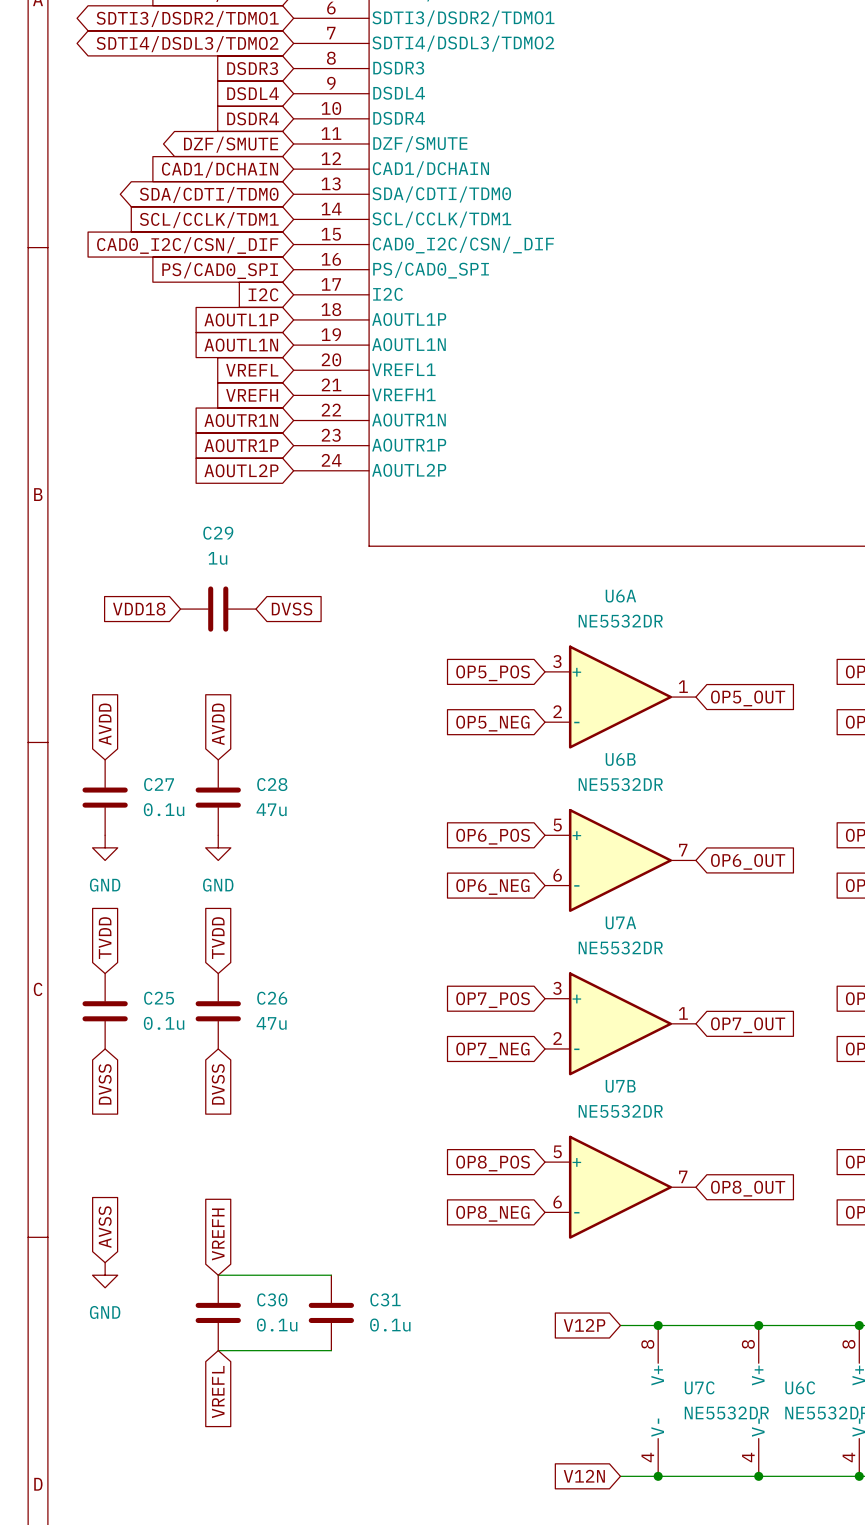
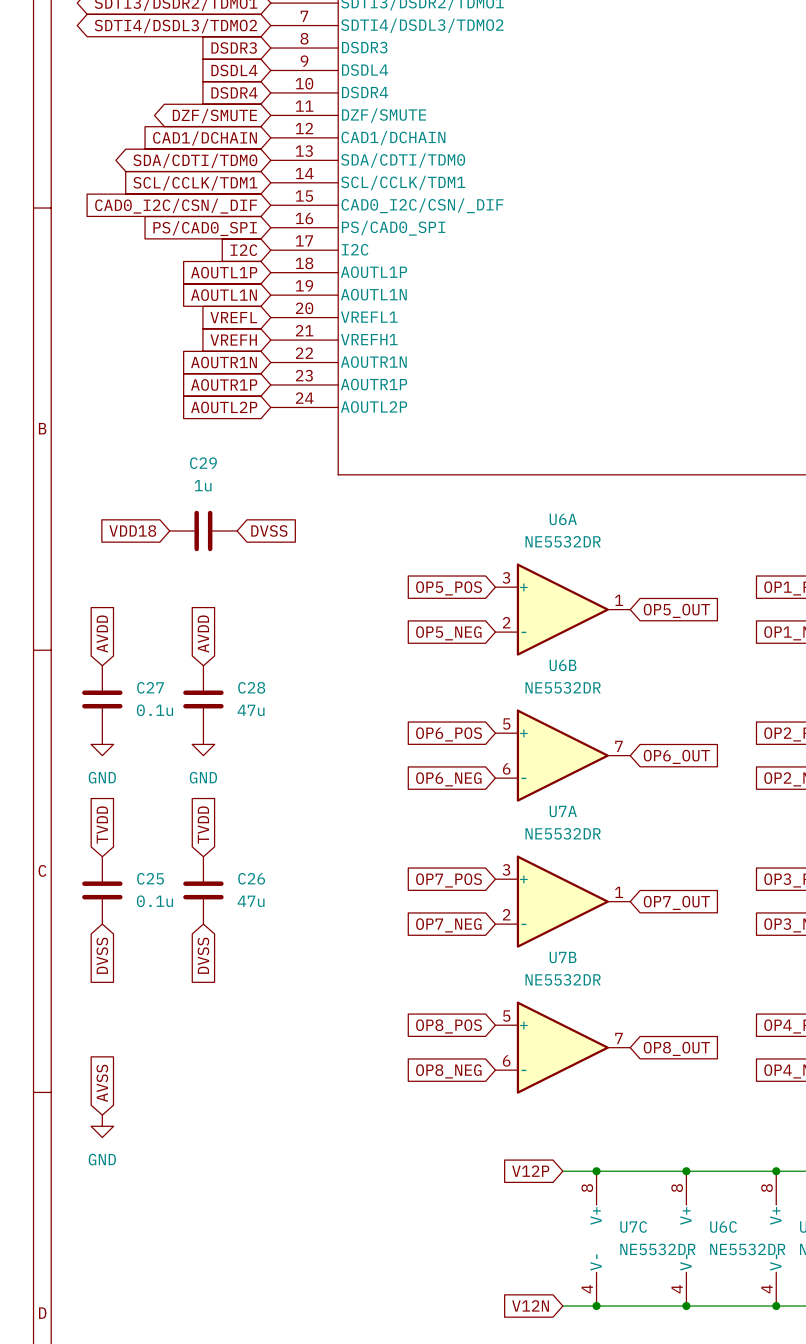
global label: VREFH (218, 1234) -> none
wire: (218, 1275) (331, 1275) -> none
C30: 0.1u (218, 1312) -> none
C31: 0.1u (331, 1312) -> none
wire: (218, 1350) (331, 1350) -> none
global label: VREFL (218, 1392) -> none

